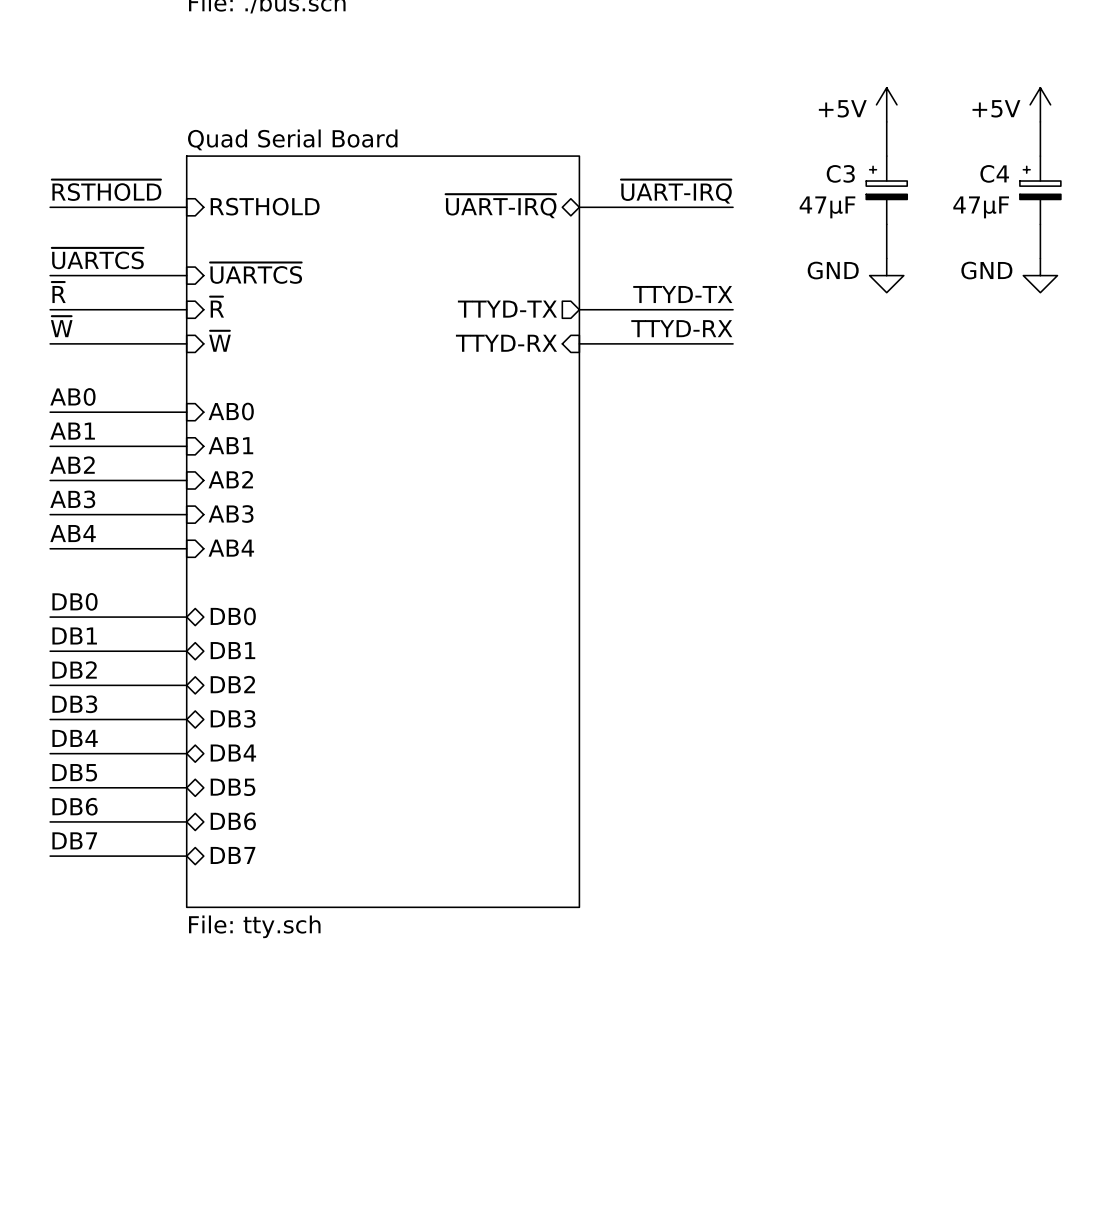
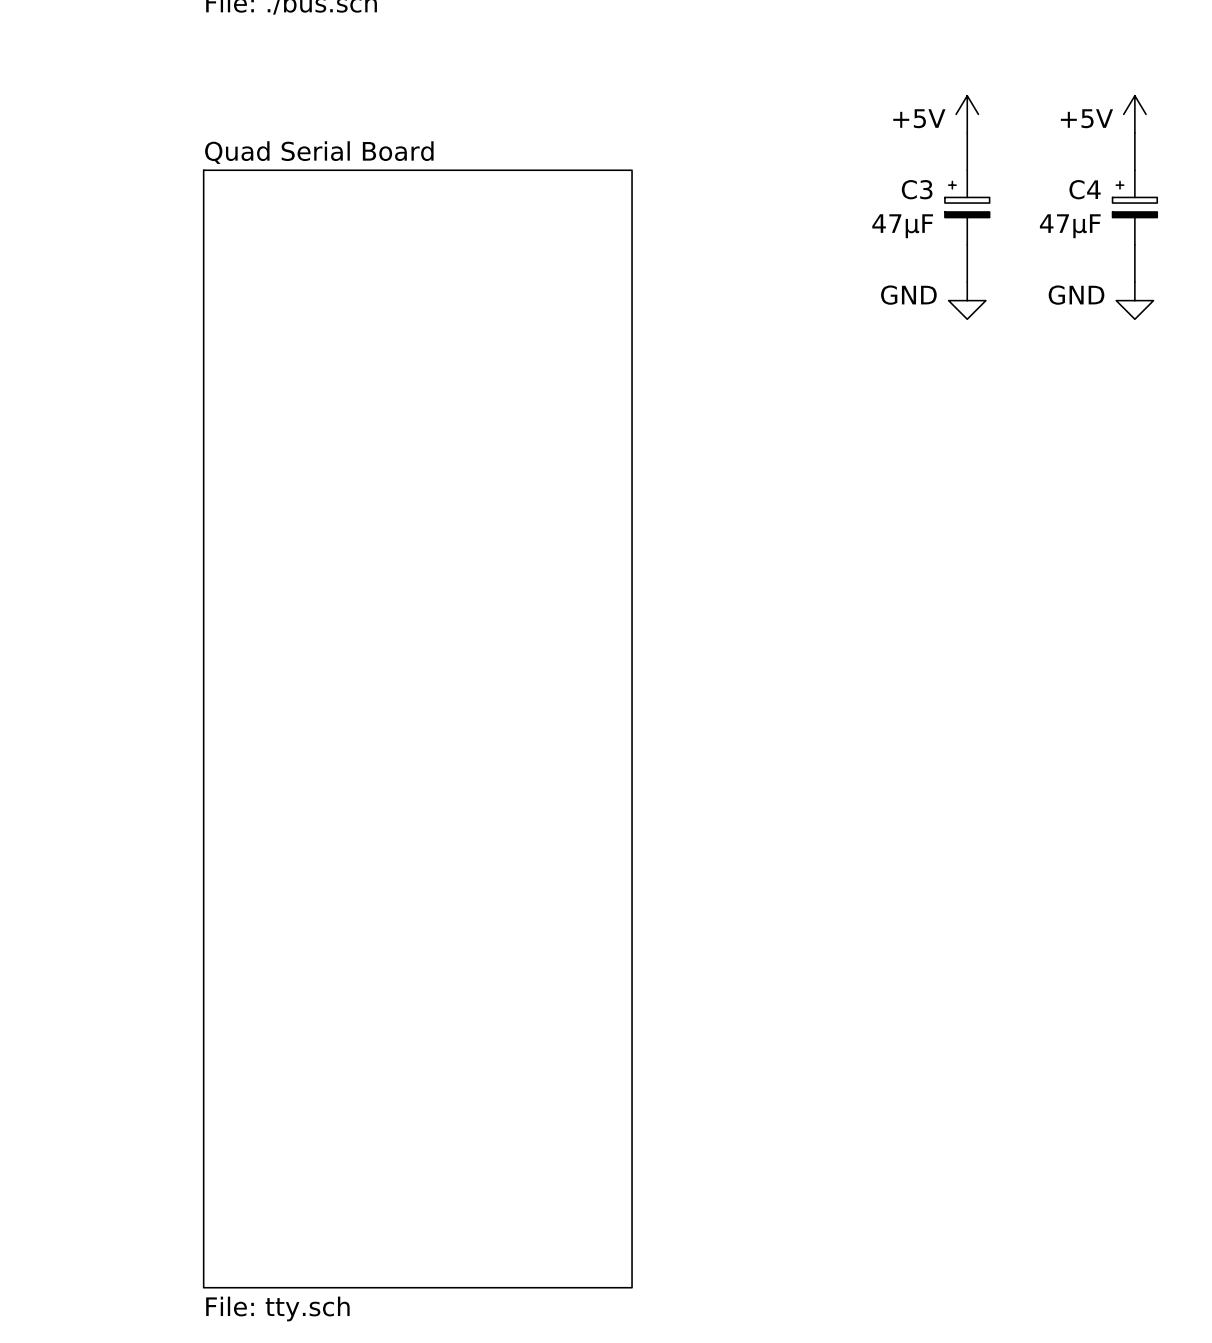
label: ~{RSTHOLD} (106, 190) -> none
label: ~{UART-IRQ} (676, 191) -> none
sheet pin: RSTHOLD (265, 206) -> none
sheet pin: ~{UART-IRQ} (501, 206) -> none
wire: (50, 207) (186, 207) -> none
wire: (579, 207) (733, 207) -> none
label: ~{UARTCS} (97, 258) -> none
sheet pin: ~{UARTCS} (256, 273) -> none
wire: (50, 275) (186, 275) -> none
label: ~{R} (58, 292) -> none
label: TTYD-TX (682, 294) -> none
sheet pin: ~{R} (217, 307) -> none
wire: (50, 309) (186, 309) -> none
sheet pin: TTYD-TX (507, 309) -> none
wire: (579, 309) (733, 309) -> none
label: ~{W} (61, 326) -> none
label: TTYD-RX (681, 328) -> none
sheet pin: ~{W} (219, 341) -> none
wire: (50, 343) (186, 343) -> none
sheet pin: TTYD-RX (506, 343) -> none
wire: (579, 343) (733, 343) -> none
label: AB0 (72, 396) -> none
sheet pin: AB0 (231, 411) -> none
wire: (50, 412) (186, 412) -> none
label: AB1 (72, 431) -> none
sheet pin: AB1 (230, 445) -> none
wire: (50, 446) (186, 446) -> none
label: AB2 (72, 465) -> none
sheet pin: AB2 (230, 479) -> none
wire: (50, 480) (186, 480) -> none
label: AB3 (72, 499) -> none
wire: (50, 514) (186, 514) -> none
sheet pin: AB3 (231, 514) -> none
sheet Quad Serial Board: File: tty.sch (383, 531) -> none
label: AB4 (73, 533) -> none
wire: (50, 548) (186, 548) -> none
sheet pin: AB4 (231, 548) -> none
label: DB0 (74, 601) -> none
sheet pin: DB0 (233, 616) -> none
wire: (50, 617) (186, 617) -> none
label: DB1 (74, 635) -> none
sheet pin: DB1 (232, 650) -> none
wire: (50, 651) (186, 651) -> none
sheet Quad Serial Board: none -> File: tty.sch (417, 728)
label: DB2 (74, 669) -> none
sheet pin: DB2 (232, 684) -> none
wire: (50, 685) (186, 685) -> none
label: DB3 (74, 704) -> none
sheet pin: DB3 (233, 718) -> none
wire: (50, 719) (186, 719) -> none
label: DB4 (75, 738) -> none
wire: (50, 753) (186, 753) -> none
sheet pin: DB4 (233, 753) -> none
label: DB5 (74, 772) -> none
wire: (50, 787) (186, 787) -> none
sheet pin: DB5 (233, 787) -> none
label: DB6 (75, 806) -> none
wire: (50, 821) (186, 821) -> none
sheet pin: DB6 (233, 821) -> none
label: DB7 (74, 840) -> none
sheet pin: DB7 (233, 855) -> none
wire: (50, 856) (186, 856) -> none

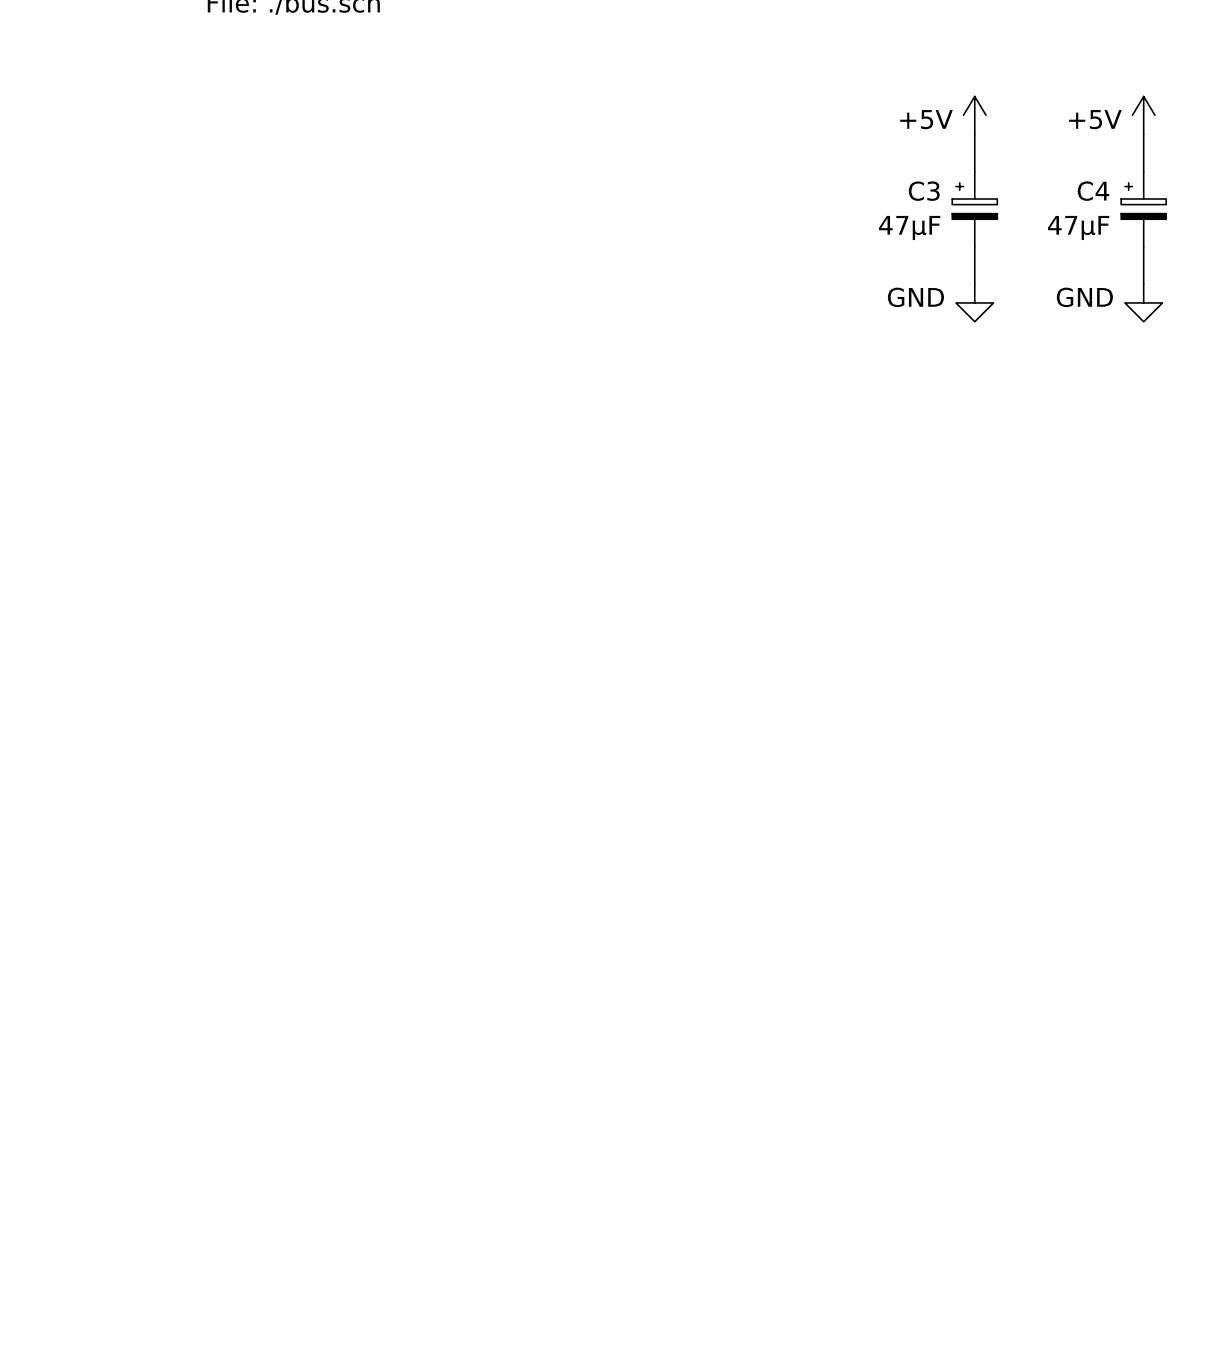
sheet Quad Serial Board: File: tty.sch (417, 728) -> none

